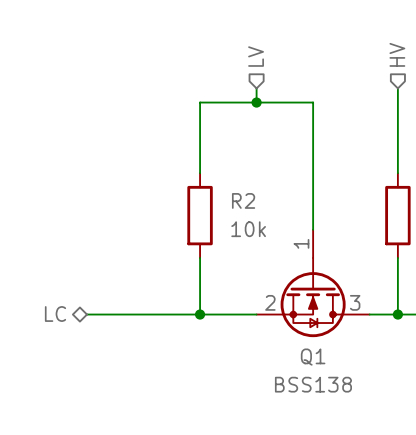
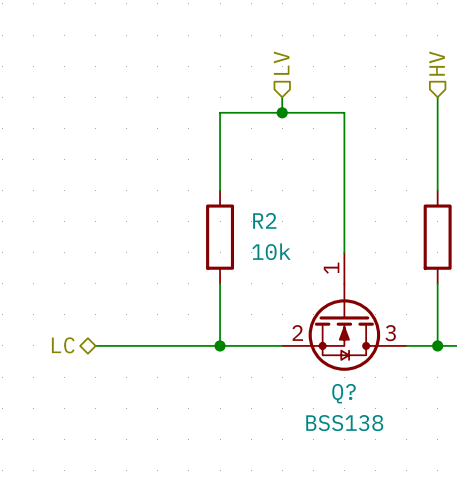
Q1 name: Q1 (313, 357) -> Q? (344, 393)

